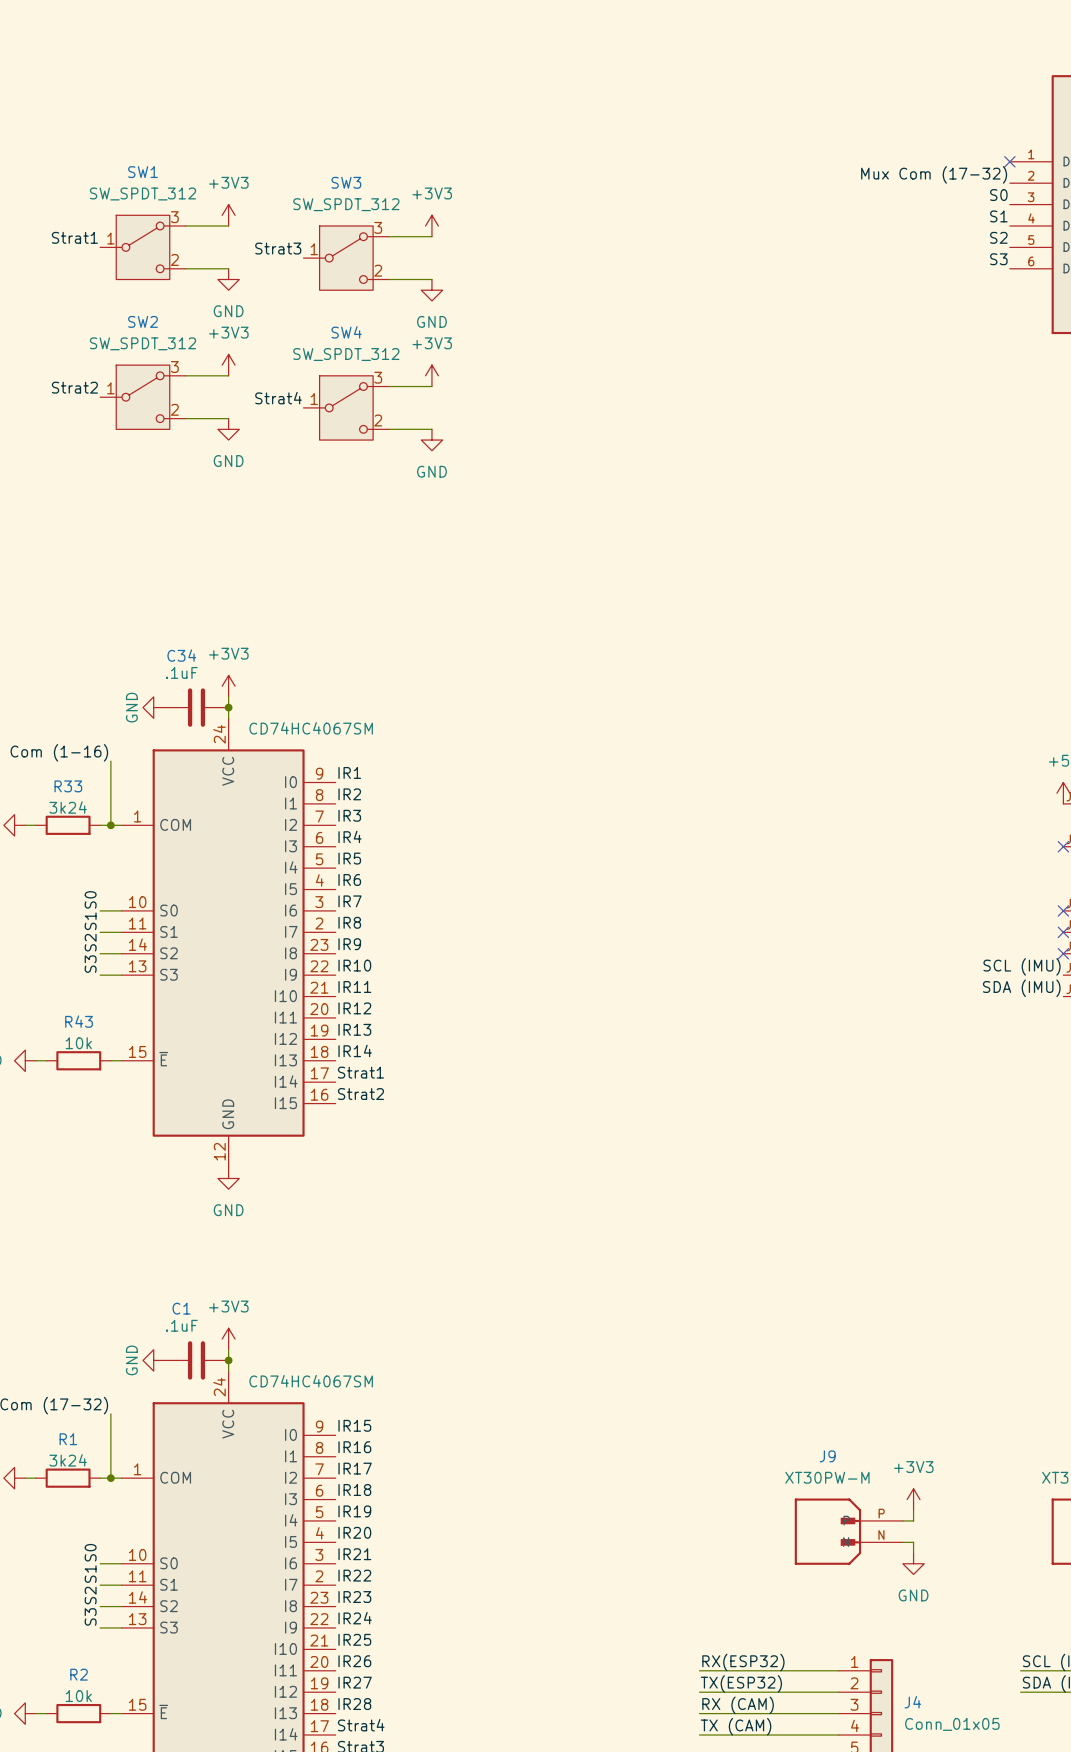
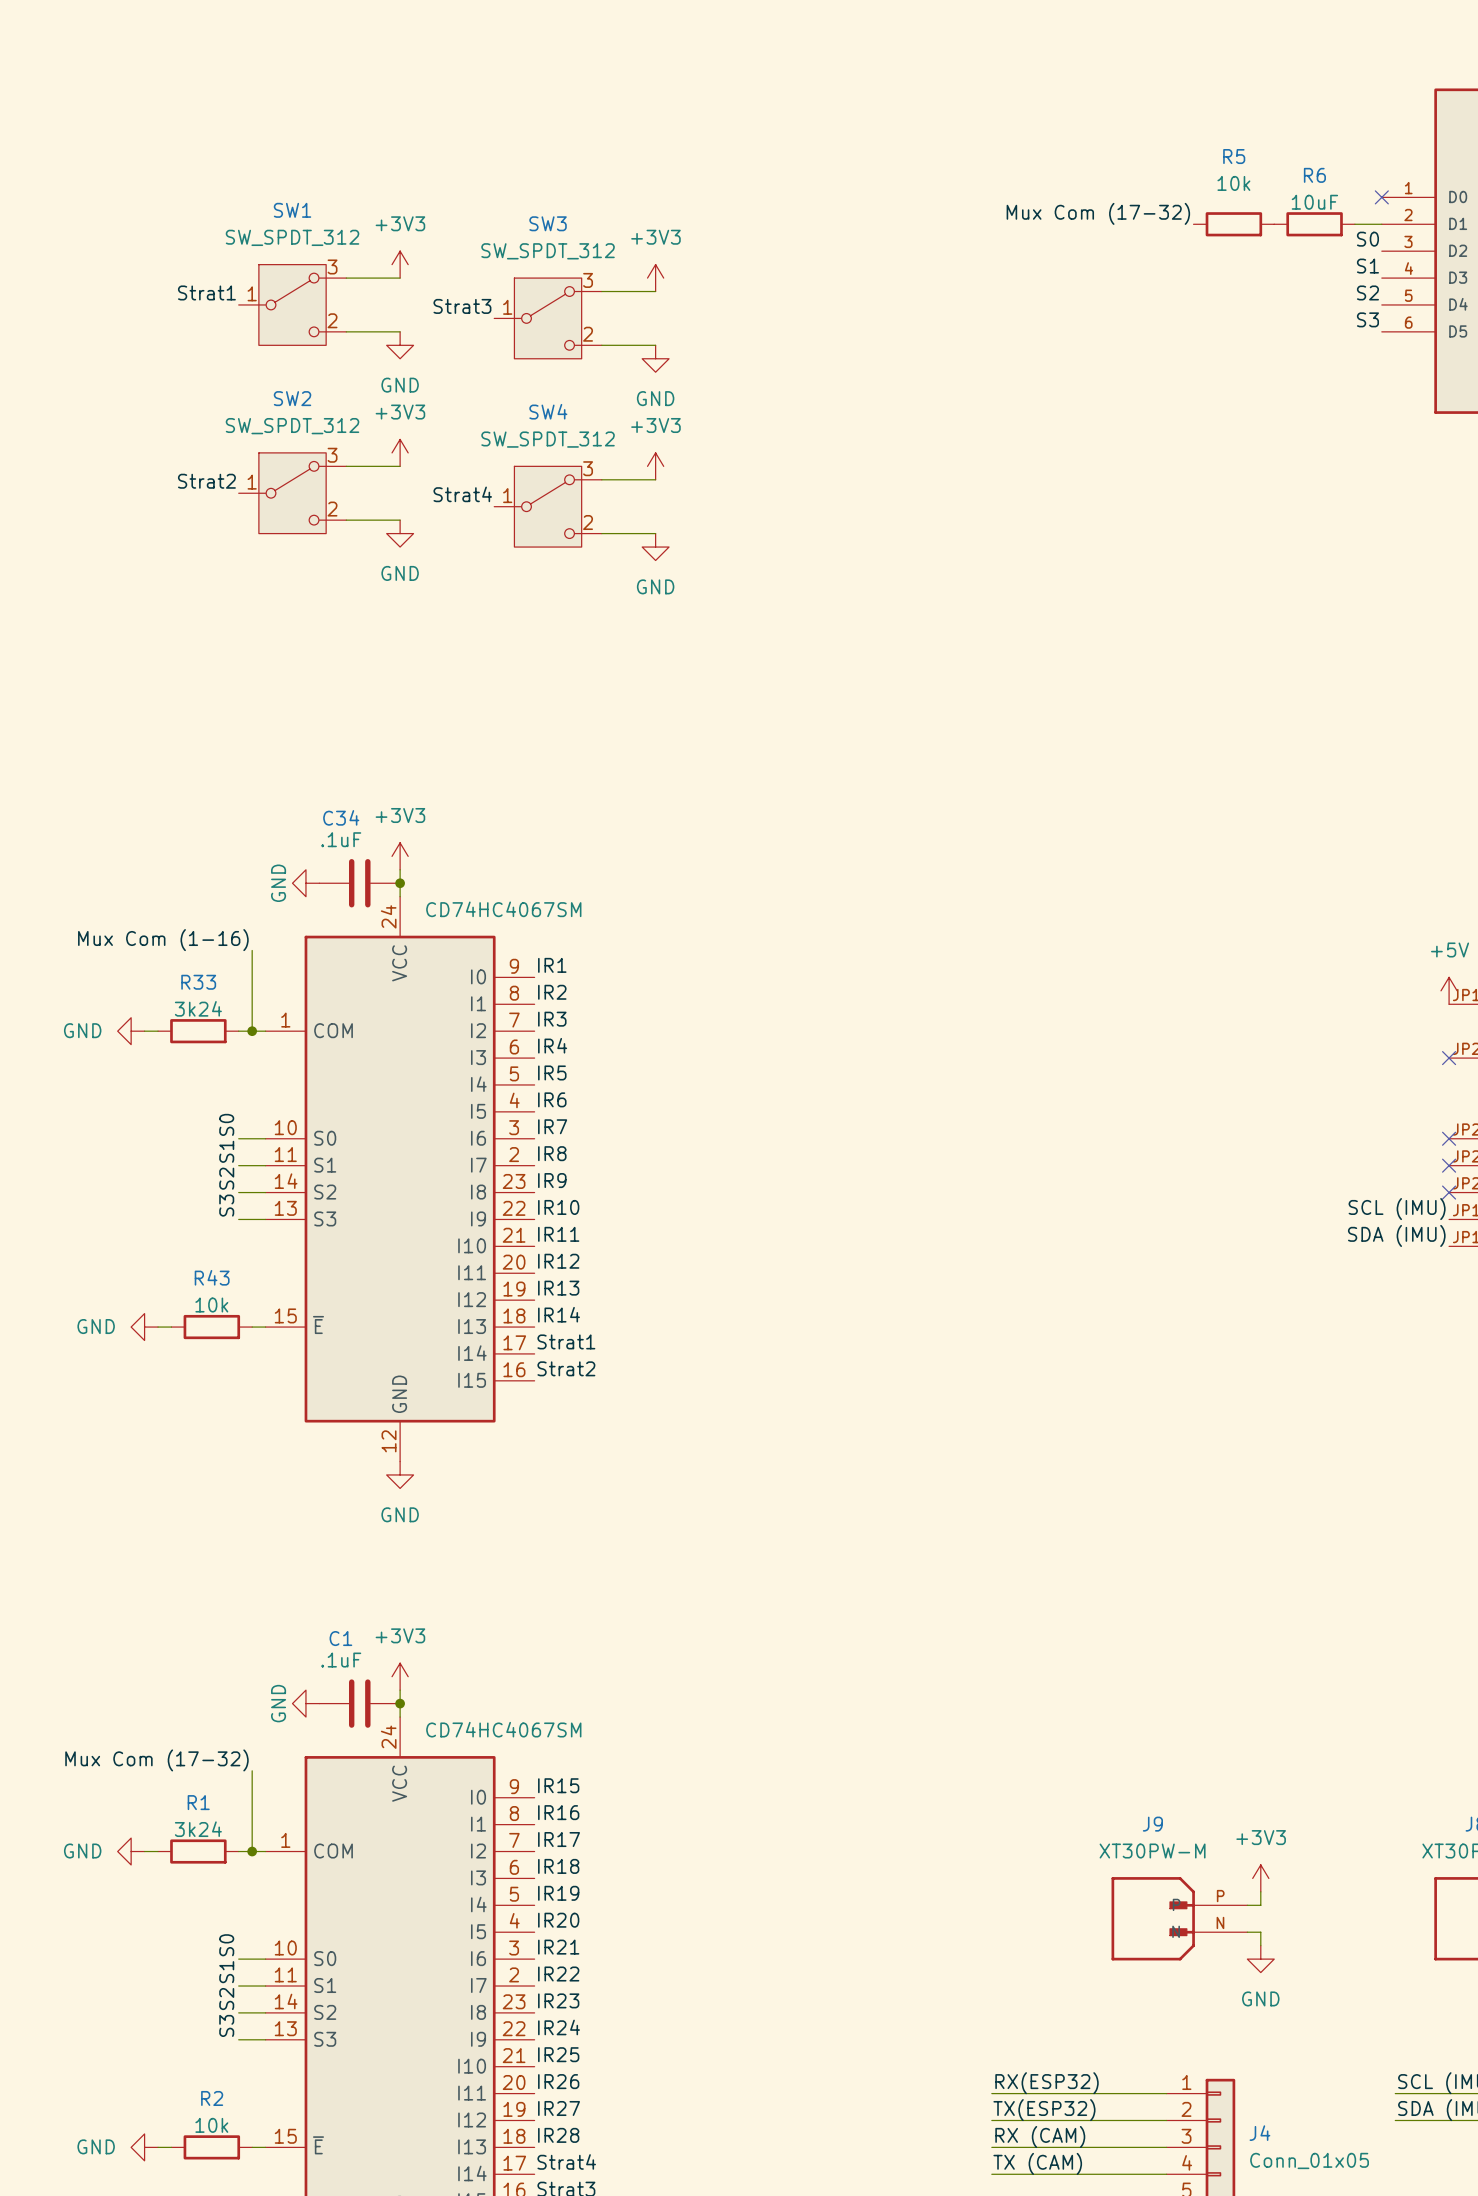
label position: Mux Com (17-32) (934, 174) -> Mux Com (17-32) (1098, 213)
R5: none -> 10k (1233, 224)
R6: none -> 10uF (1314, 224)
wire: none -> (1354, 224) (1381, 224)

